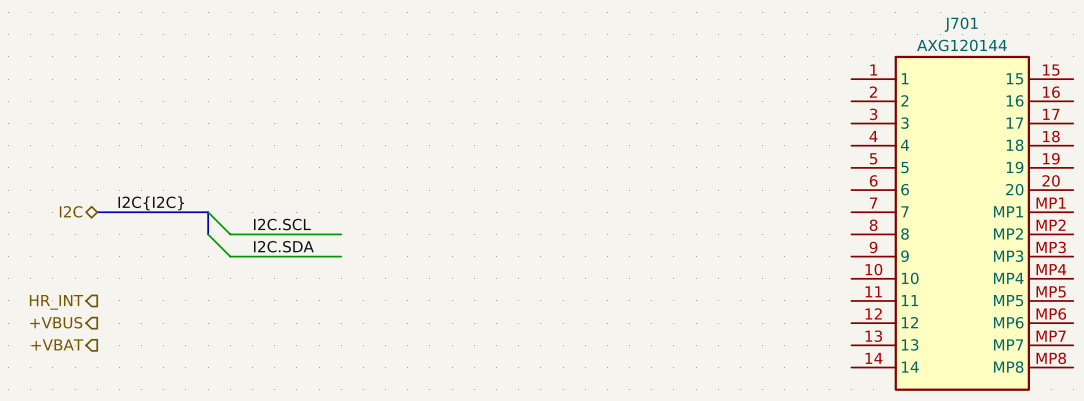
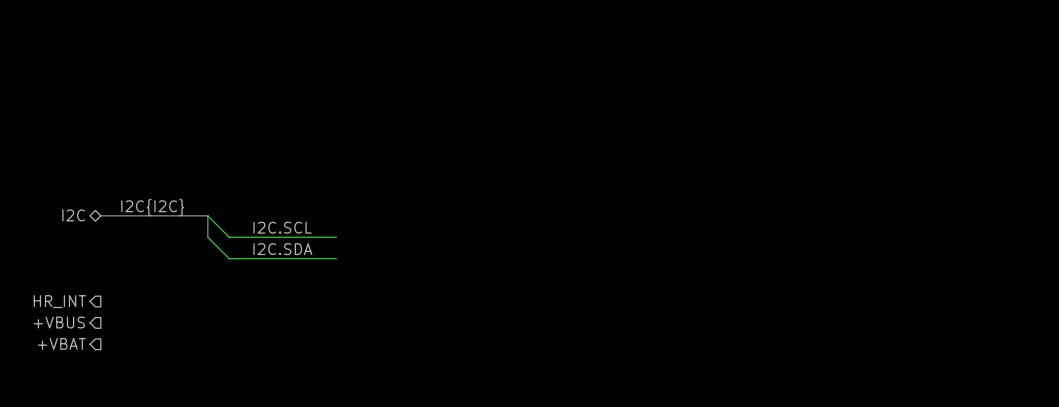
J701: AXG120144 (962, 223) -> none

